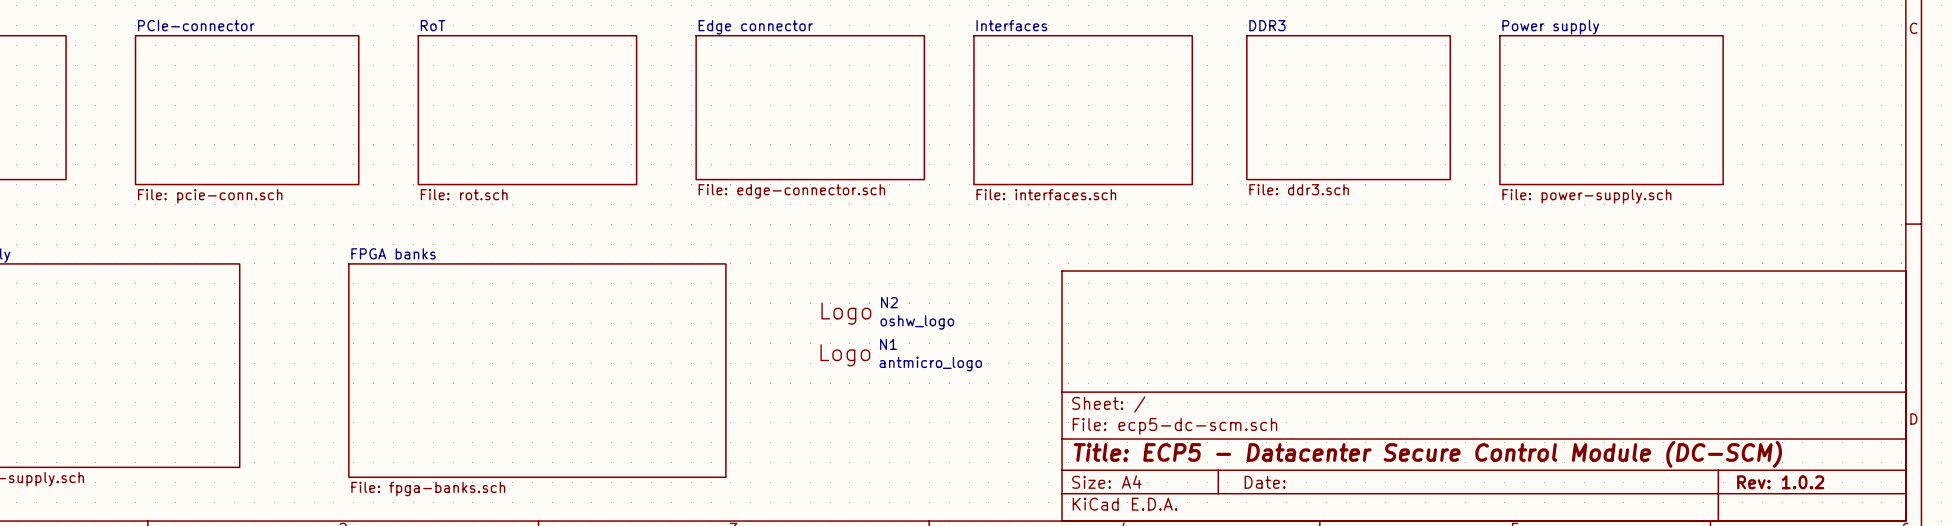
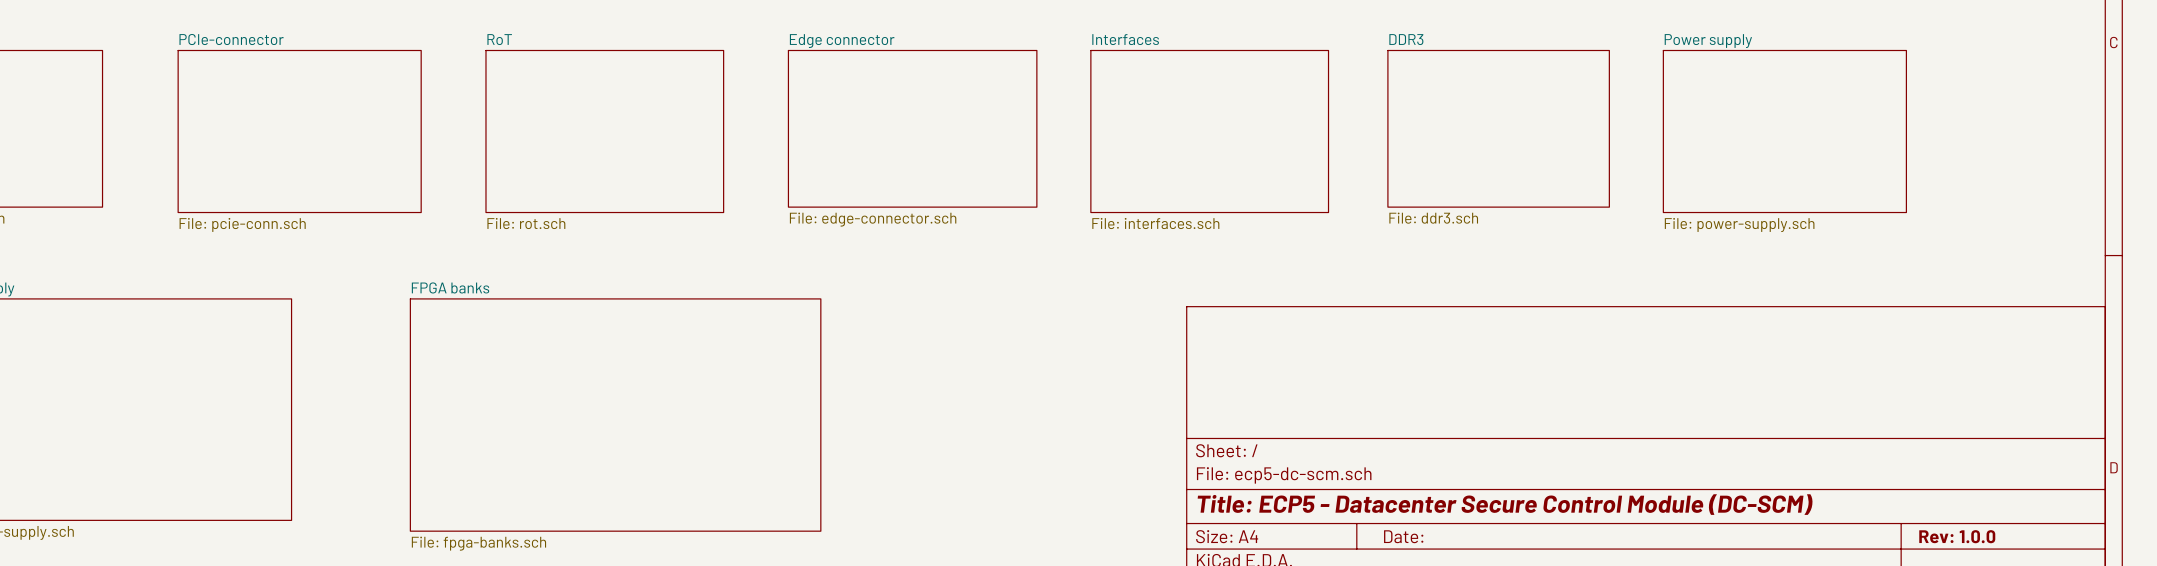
N2: oshw_logo (887, 313) -> none
N1: antmicro_logo (901, 355) -> none
title block: Rev: 1.0.2 (1780, 482) -> Rev: 1.0.0 (1957, 536)

